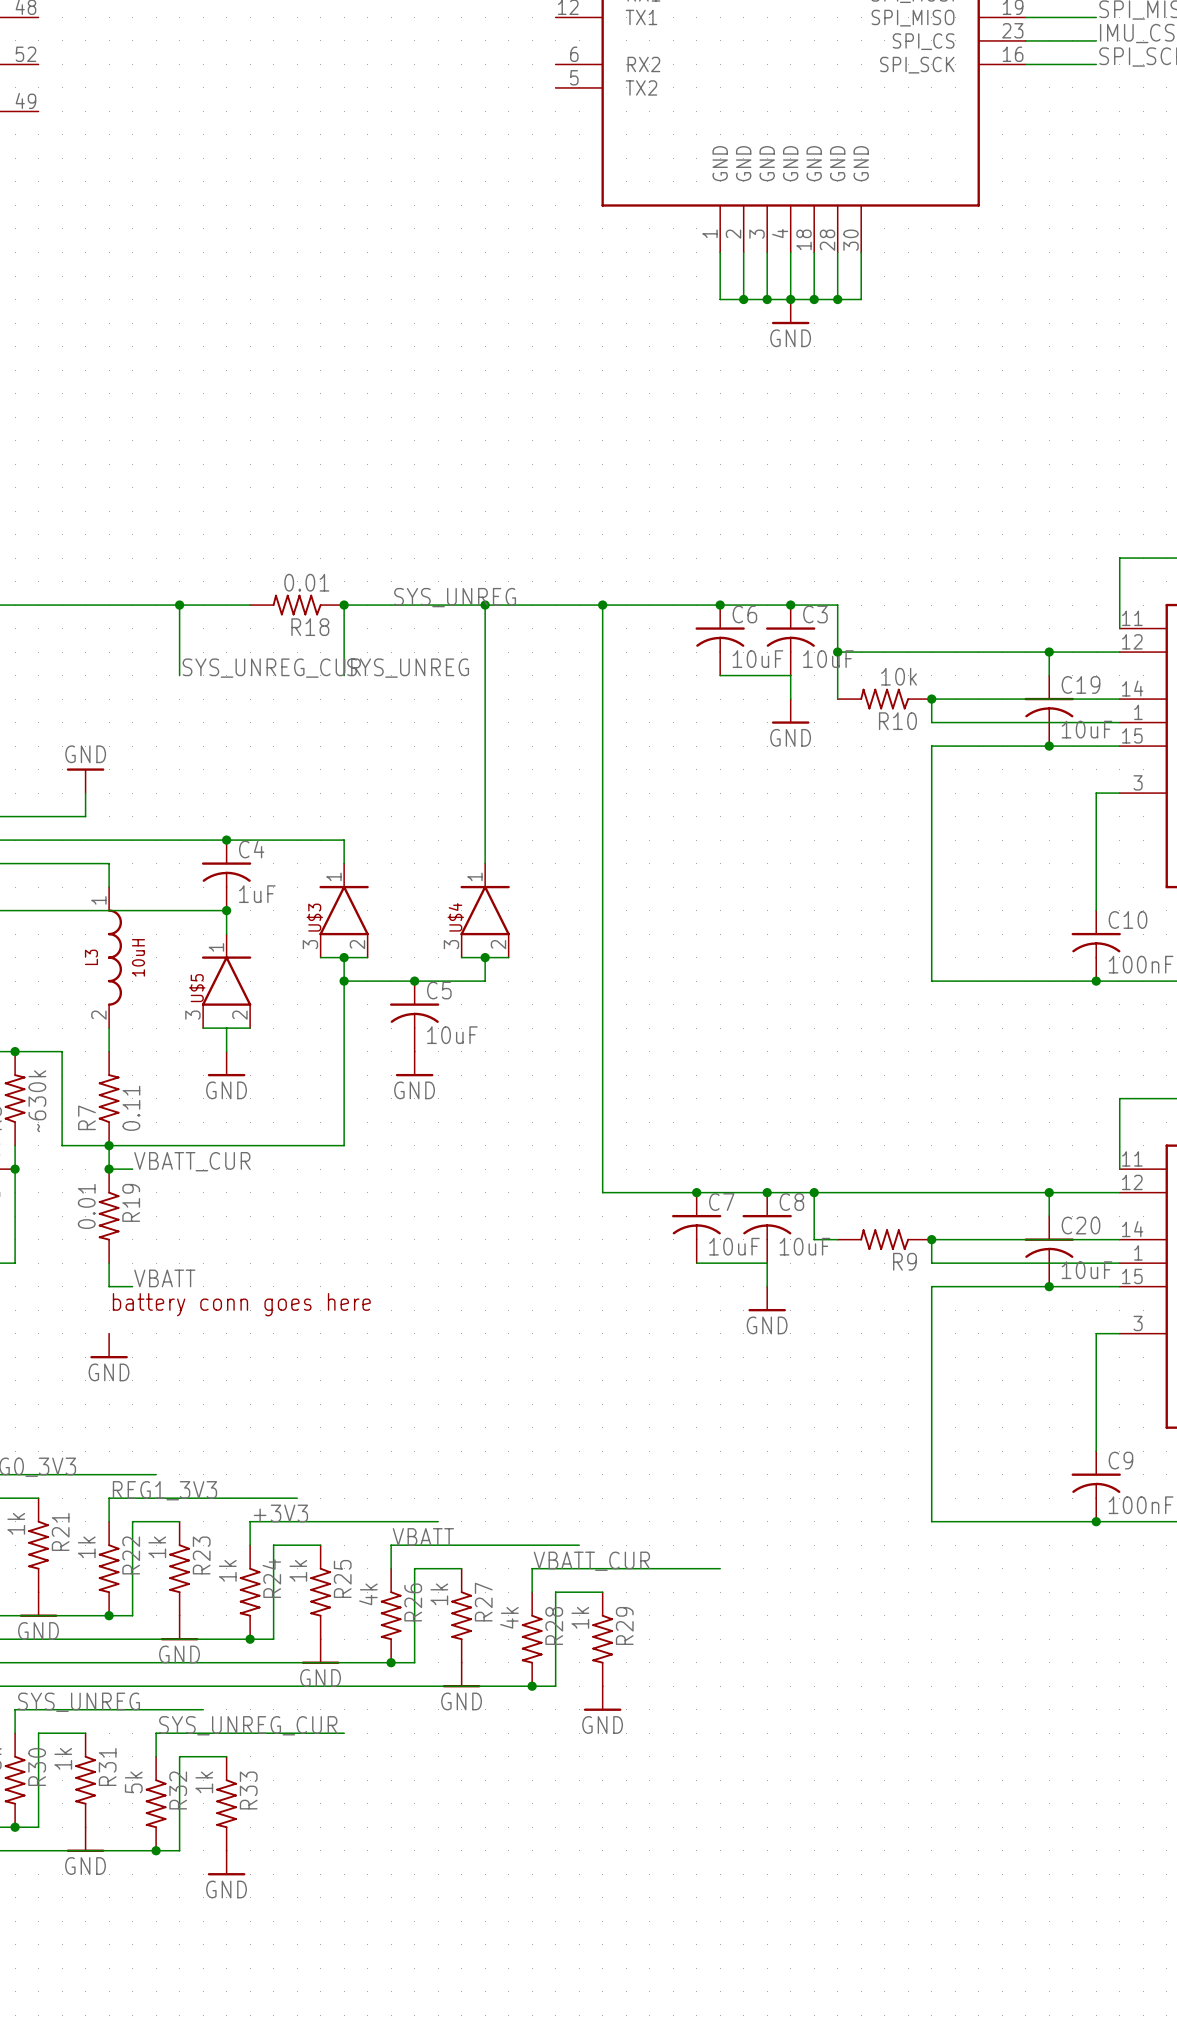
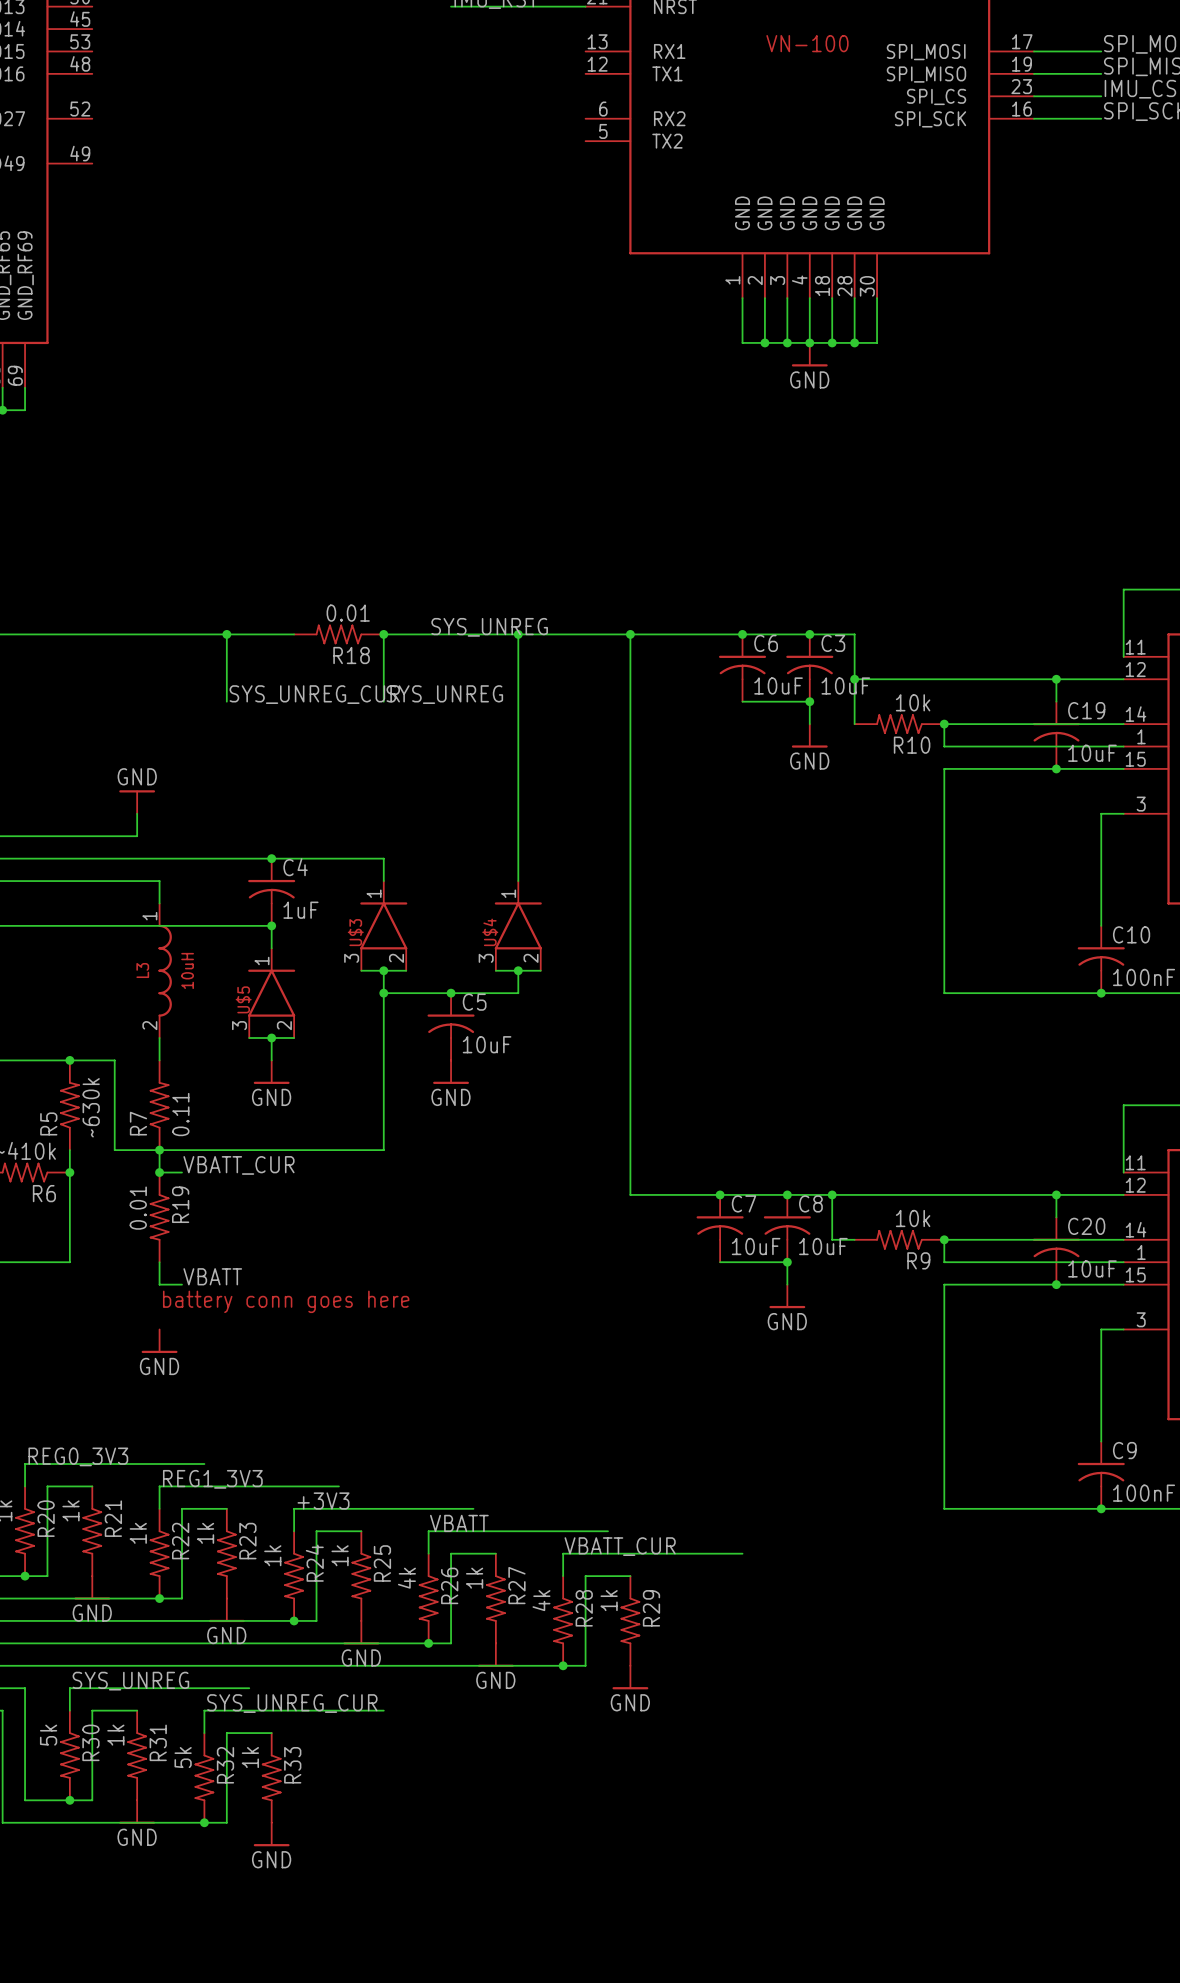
junction: none -> (809, 701)
junction: none -> (271, 1038)
R9 value: none -> 10k (913, 1218)
junction: none -> (787, 1262)

